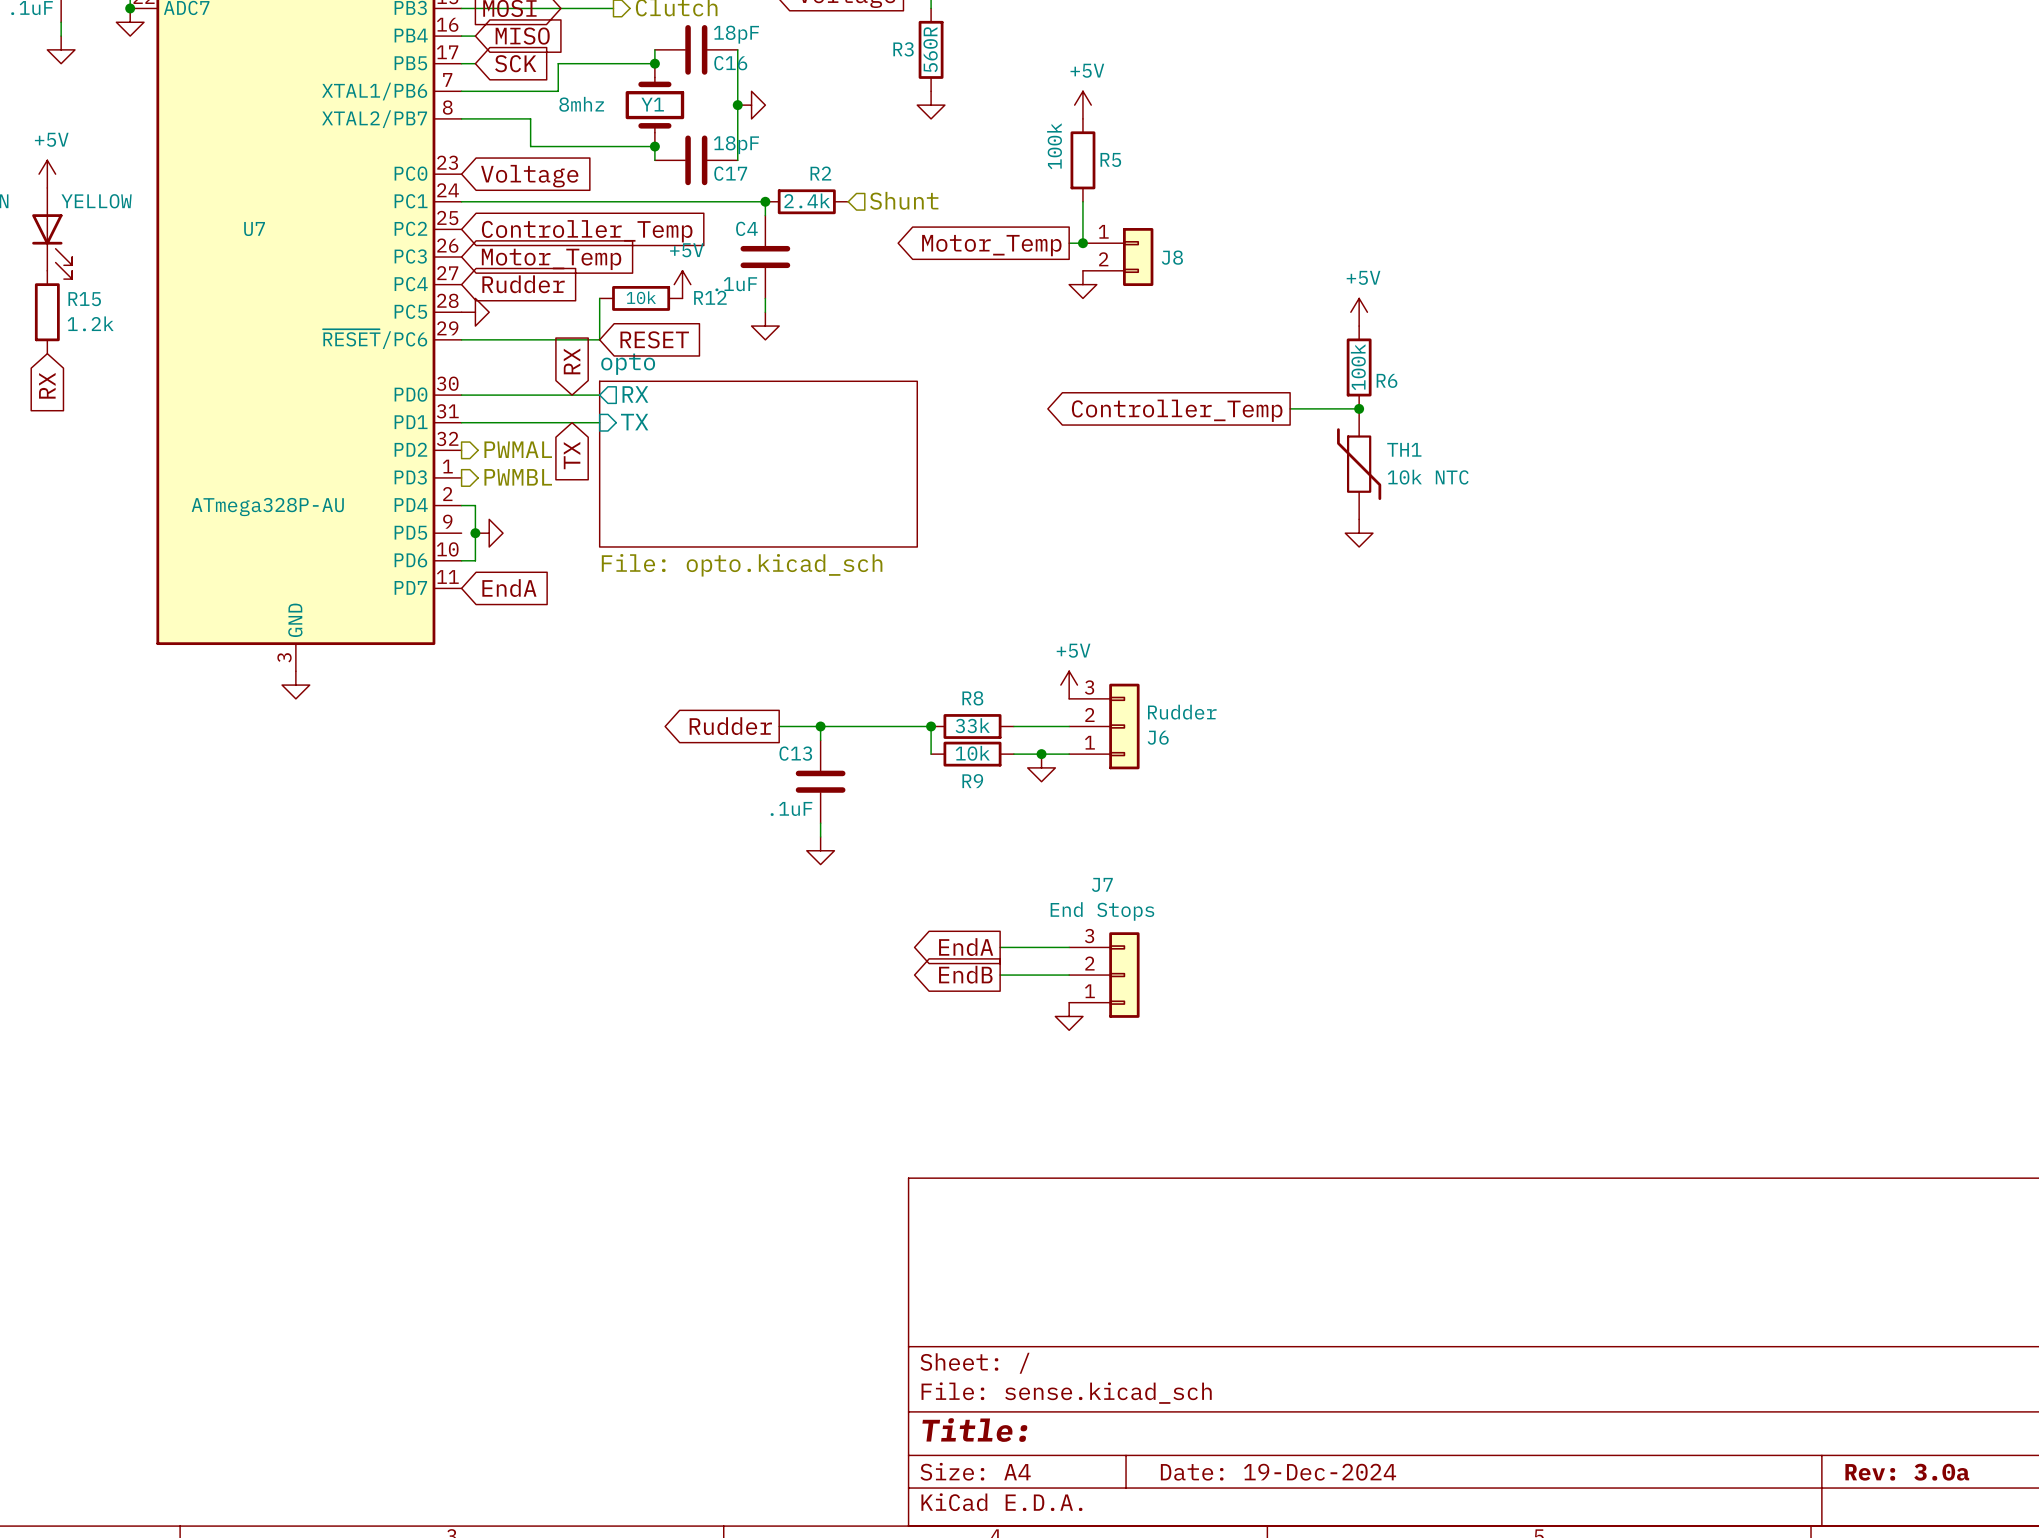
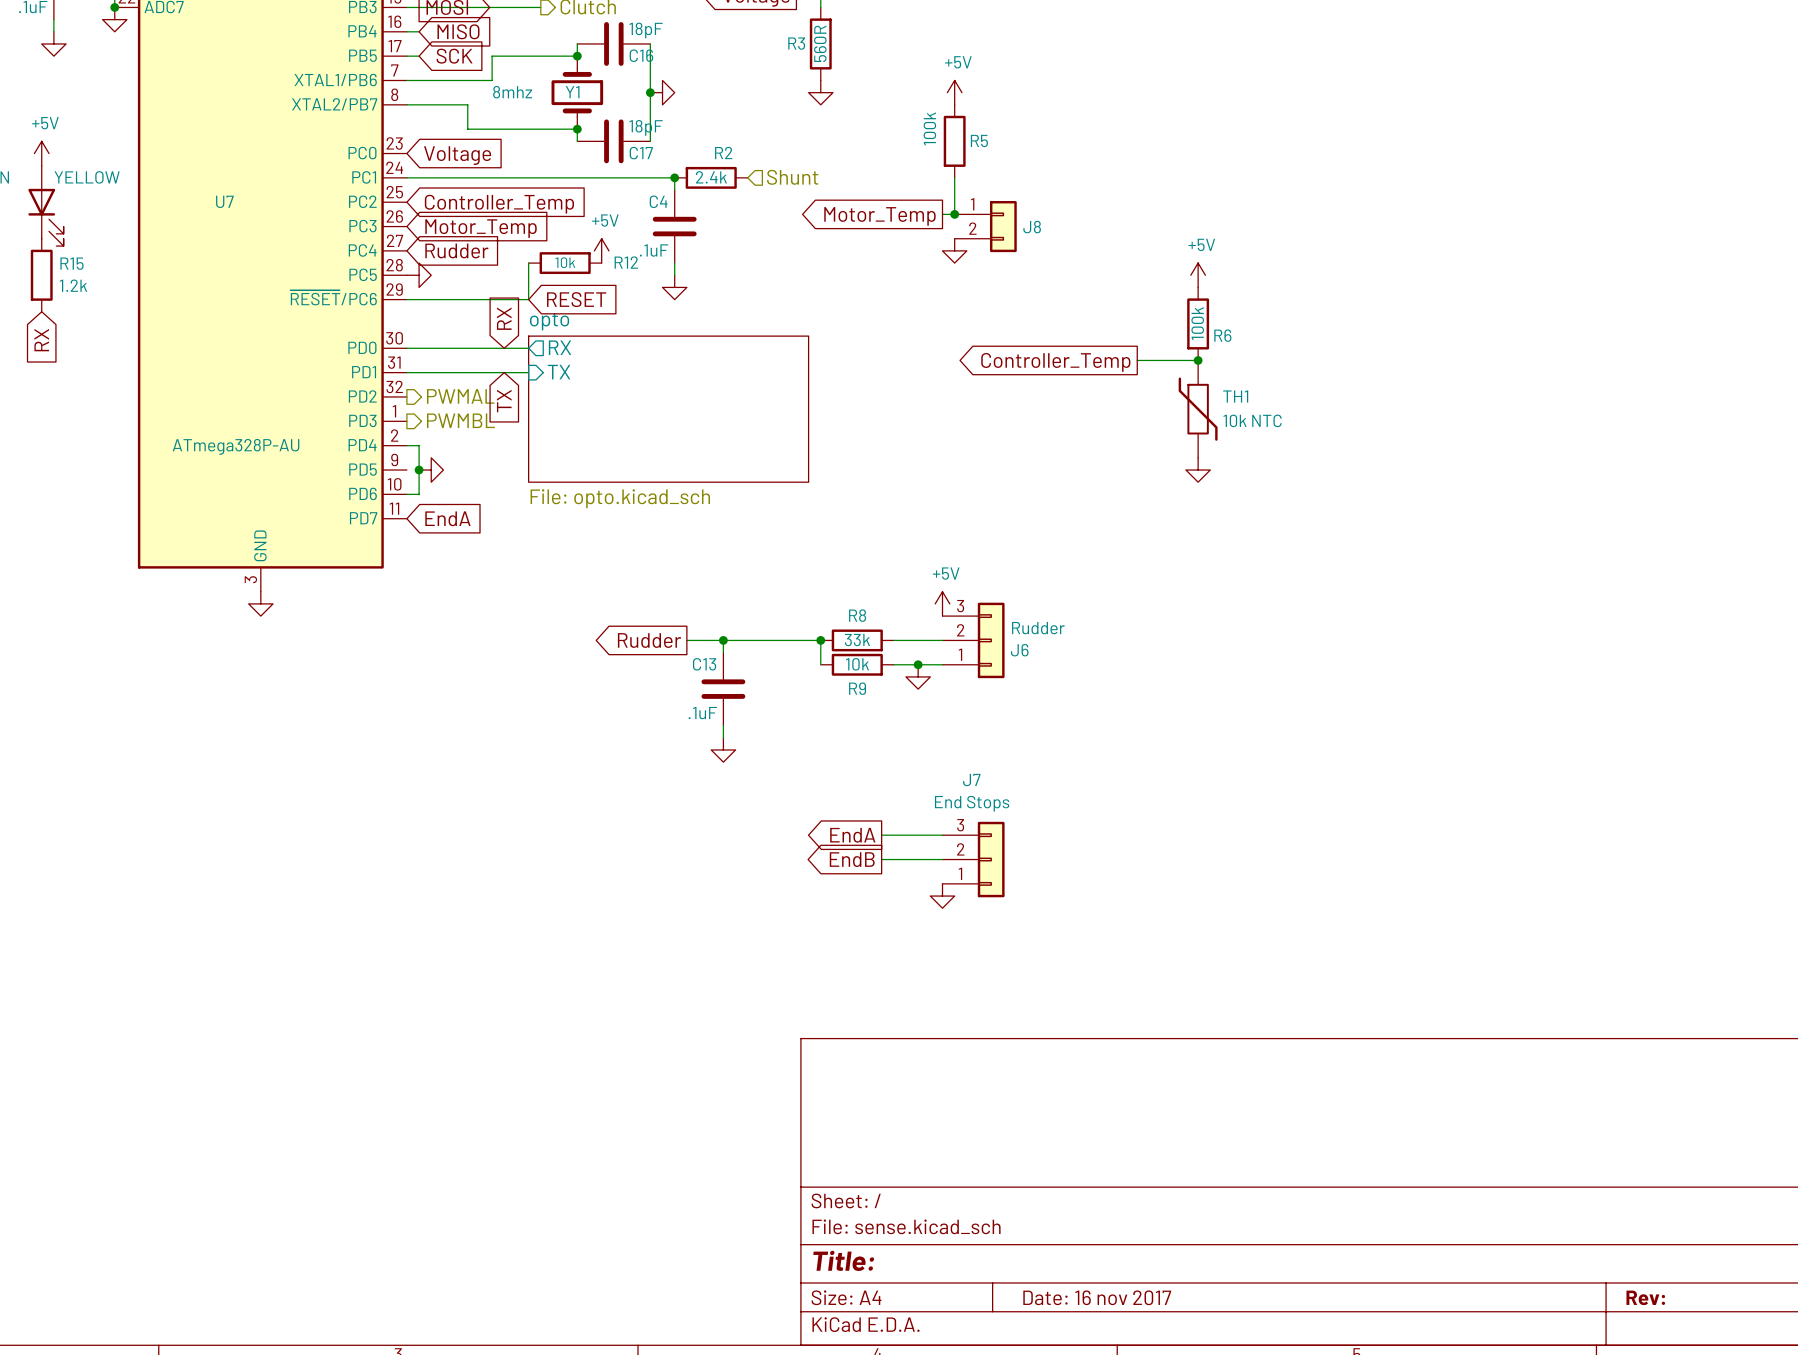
title block: Date: 19-Dec-2024 (1278, 1472) -> Date: 16 nov 2017 (1097, 1297)
title block: Rev: 3.0a (1907, 1472) -> Rev: (1645, 1297)

